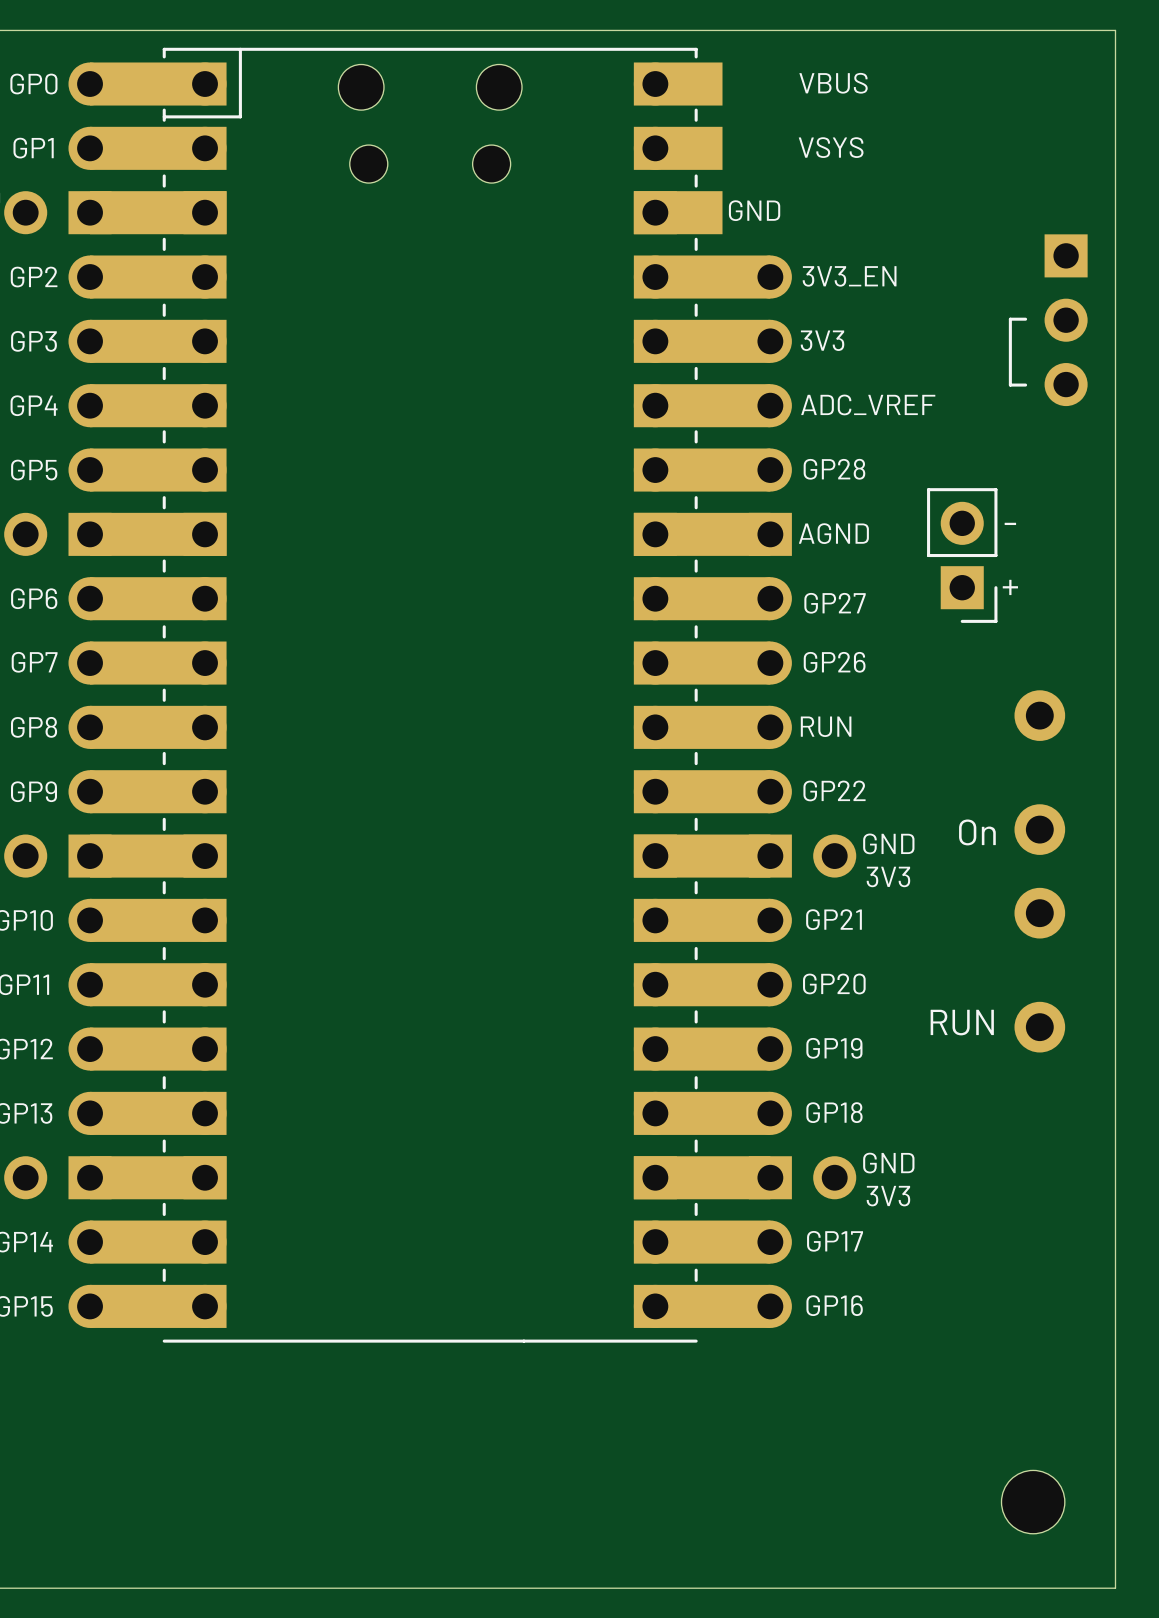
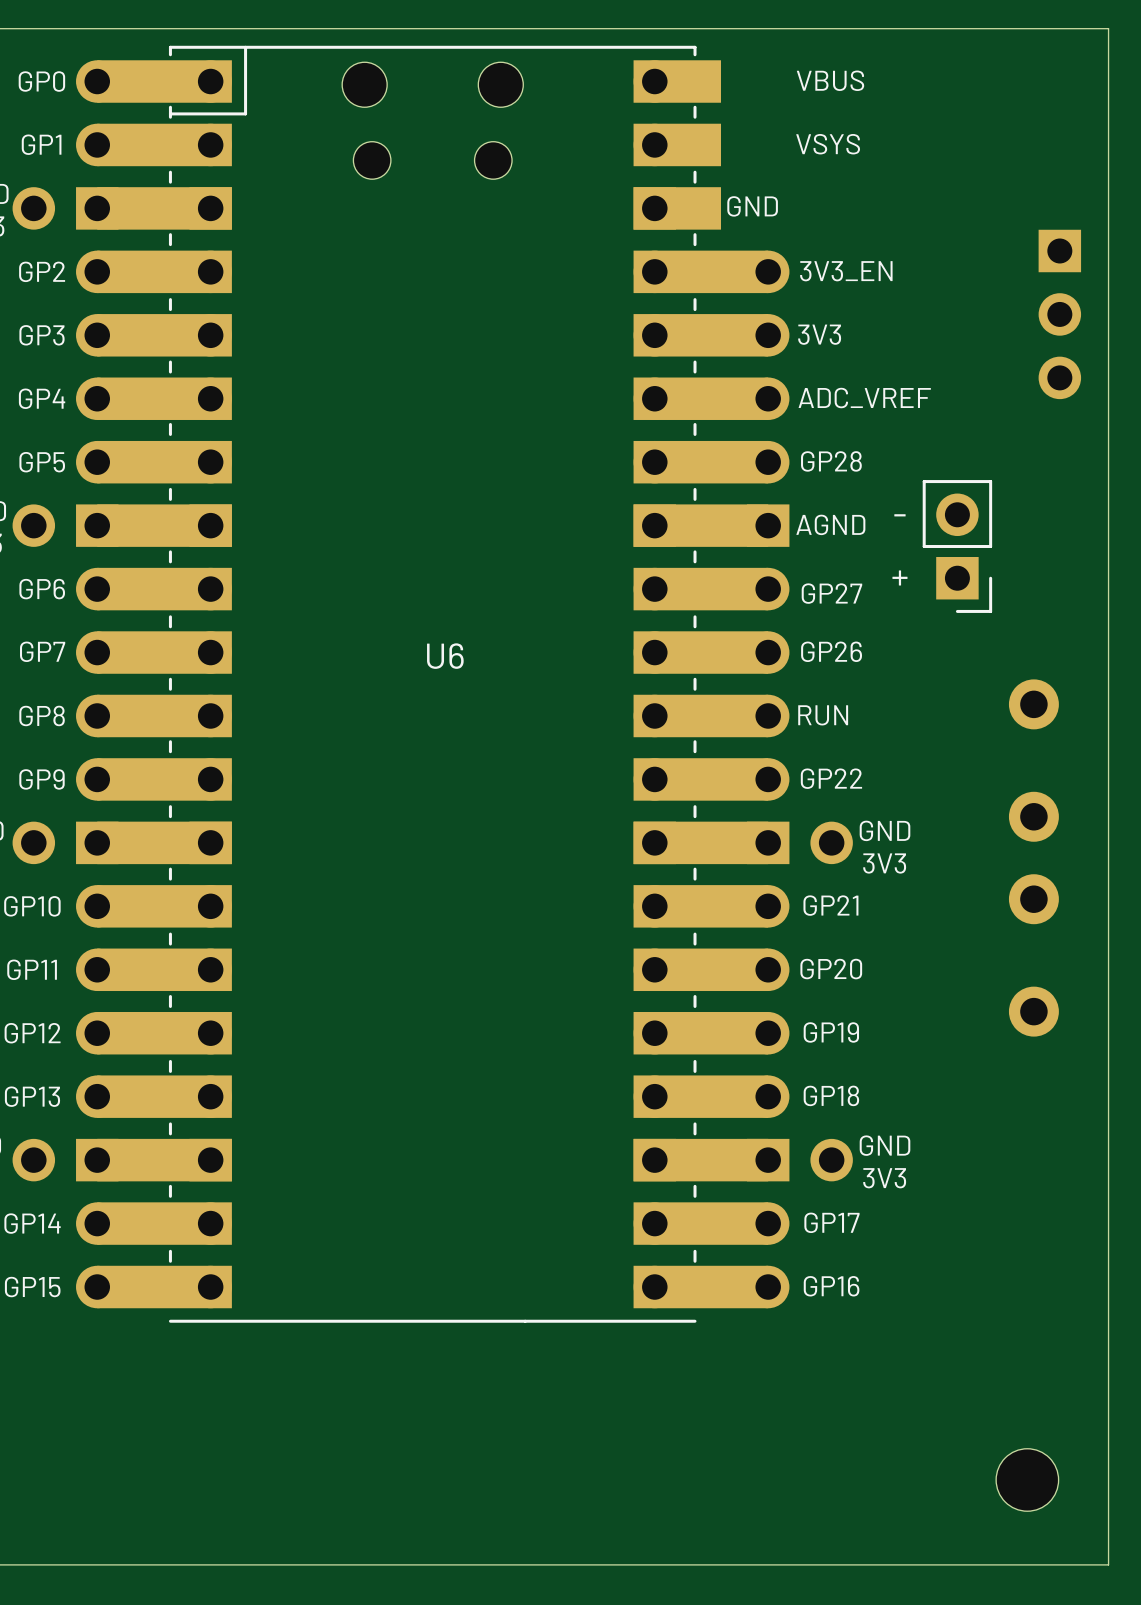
line: (1025, 319) (1010, 319) (1010, 385) (1025, 385) -> none
text position: - (1010, 523) -> - (899, 515)
text position: + (1010, 587) -> + (899, 577)
U6 name: none -> U6 (445, 656)
text: On (977, 832) -> none
text: RUN (962, 1022) -> none

